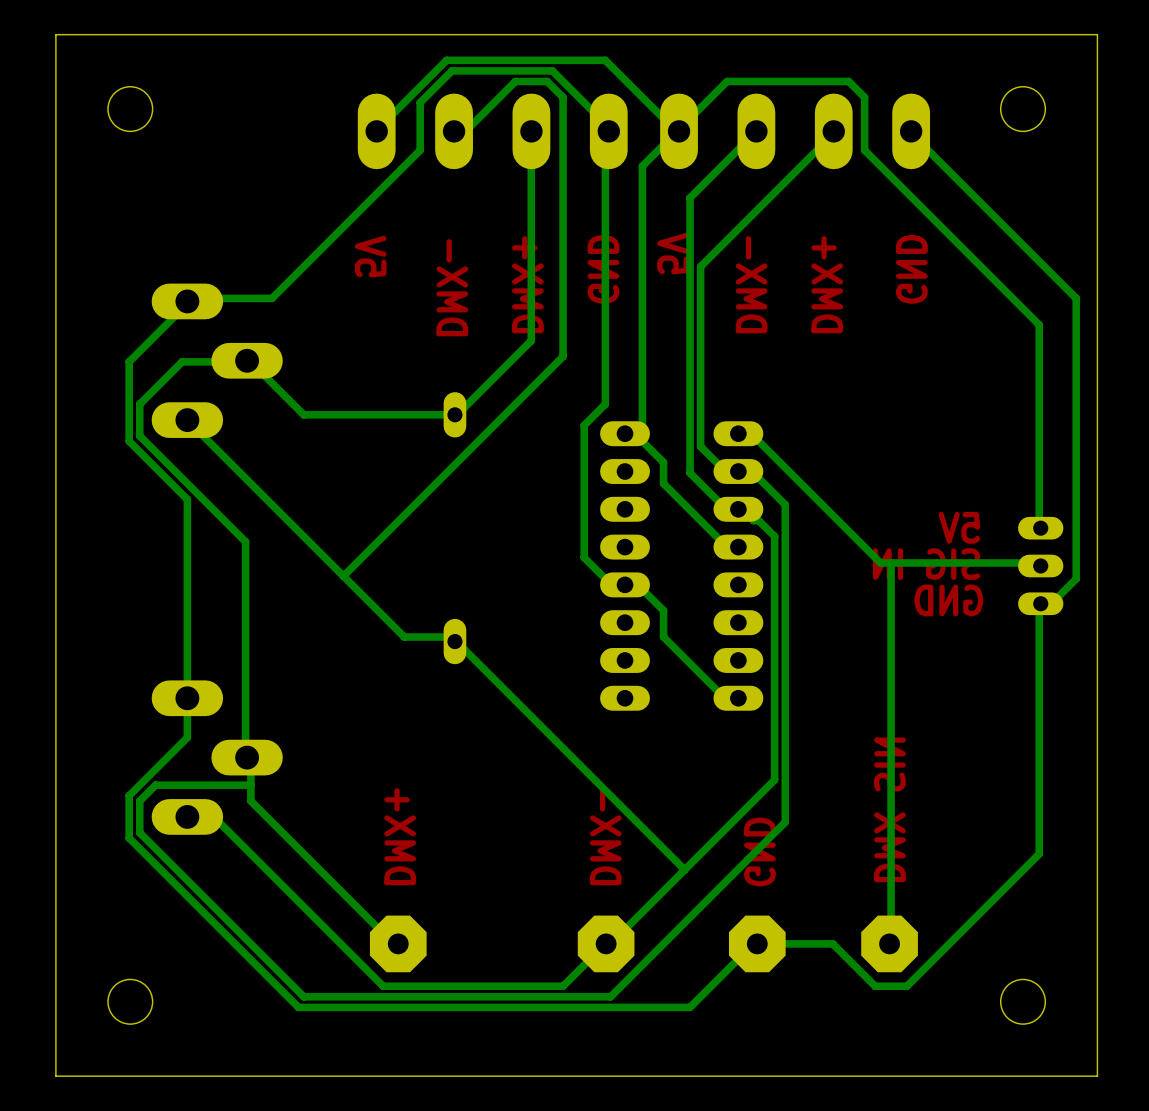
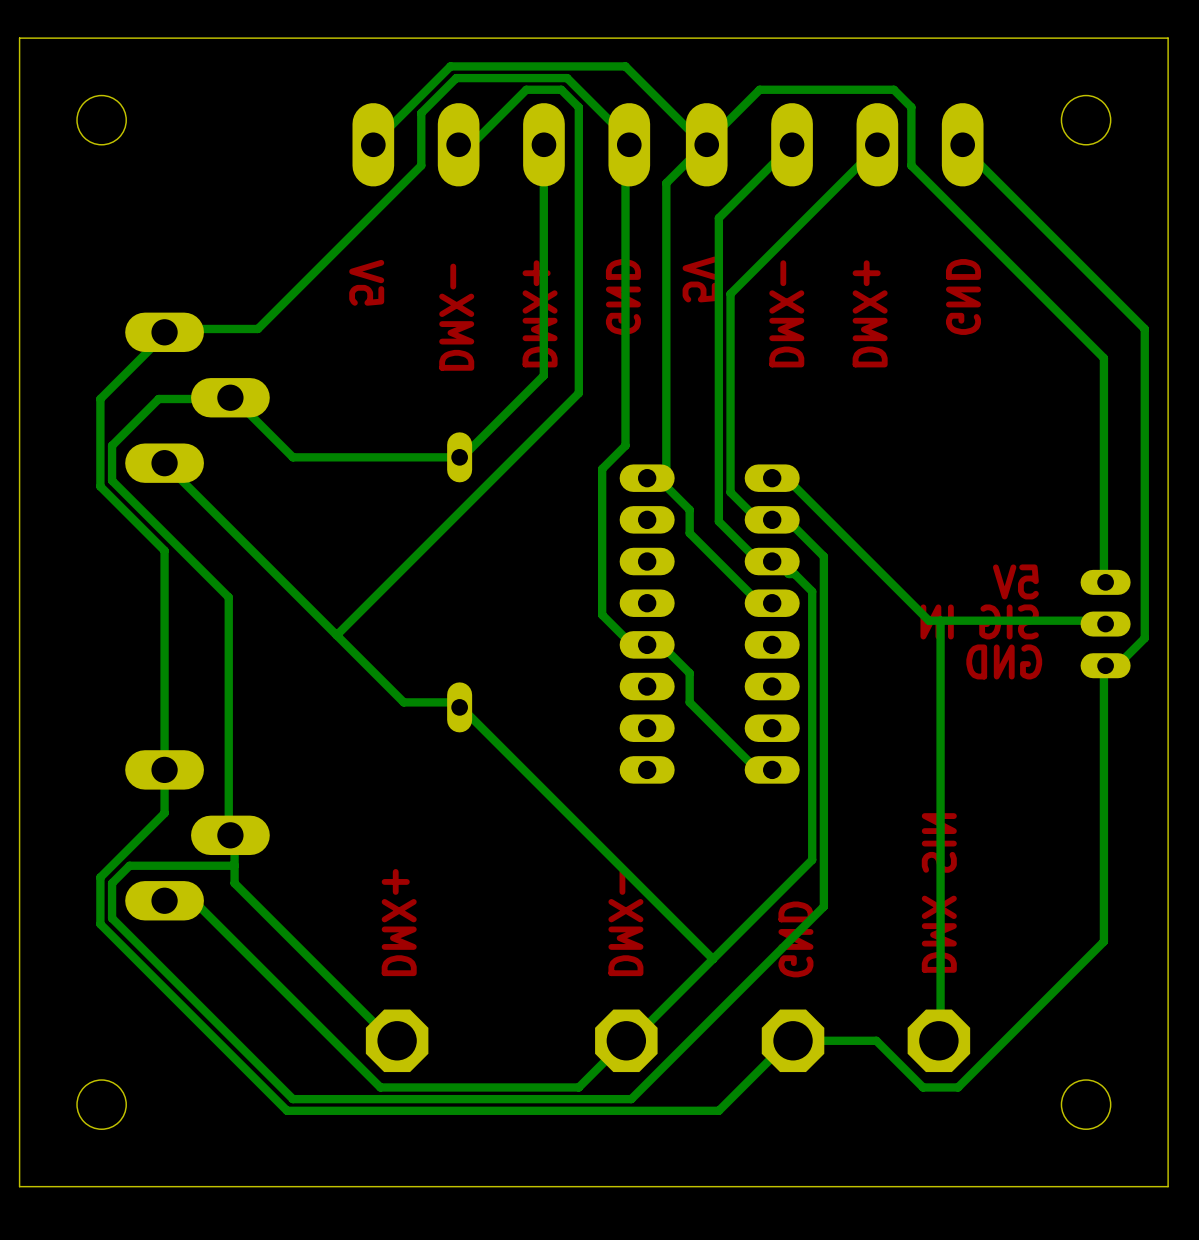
part footprint: [369, 915, 427, 973] -> [365, 1009, 429, 1073]
part footprint: [577, 915, 635, 973] -> [595, 1009, 658, 1073]
part footprint: [728, 915, 786, 973] -> [761, 1009, 825, 1073]
part footprint: [861, 915, 918, 973] -> [907, 1009, 971, 1073]

